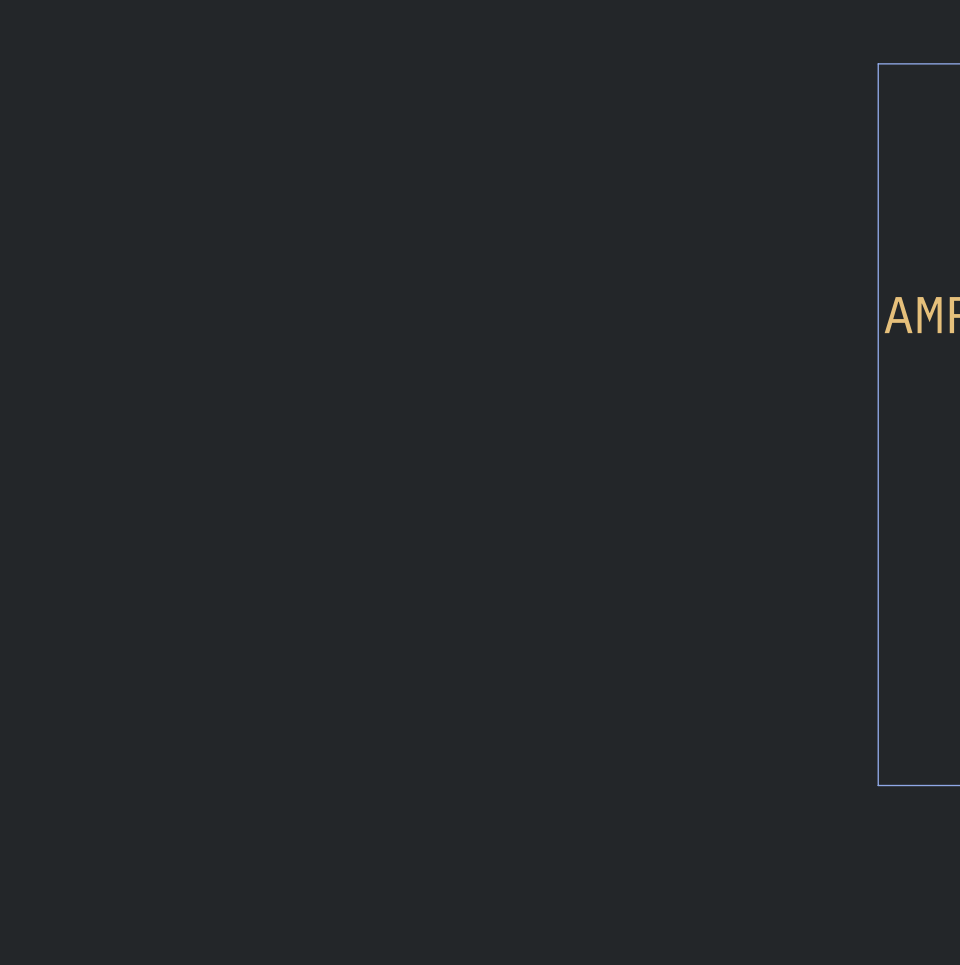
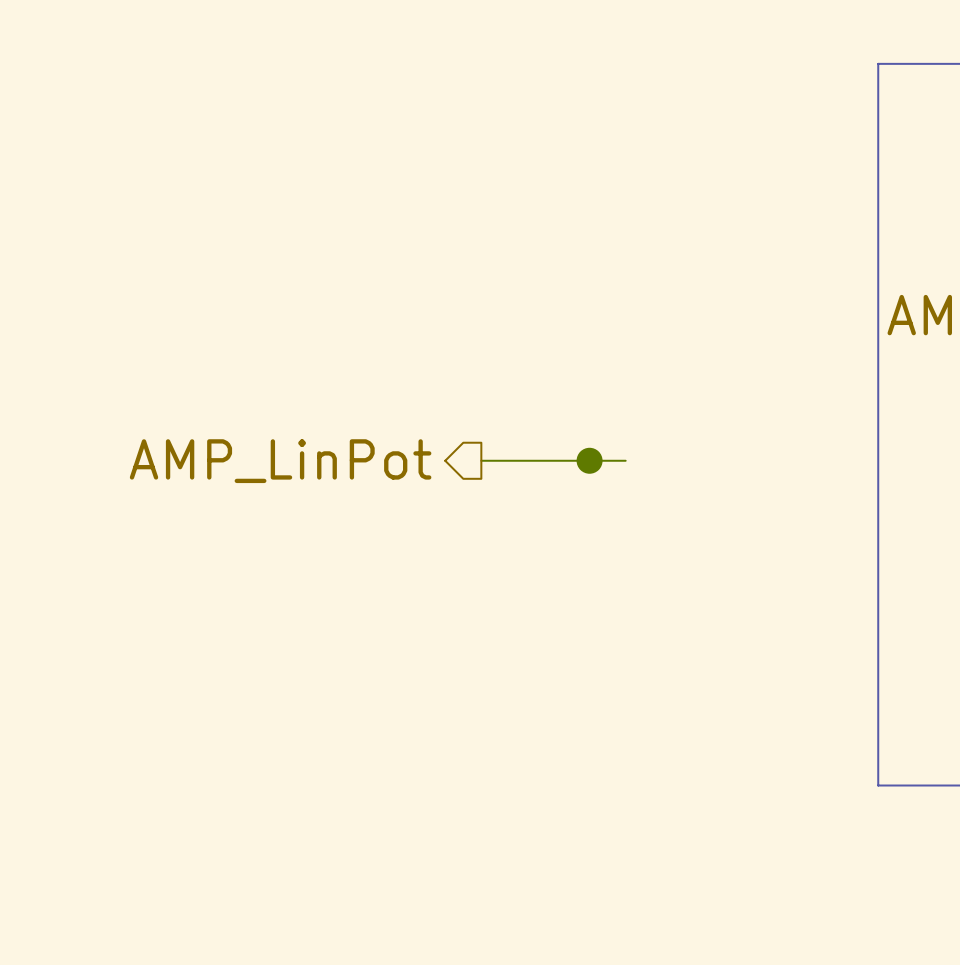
wire: none -> (481, 460) (625, 460)
junction: none -> (589, 460)
hierarchical label: none -> AMP_LinPot (280, 461)

